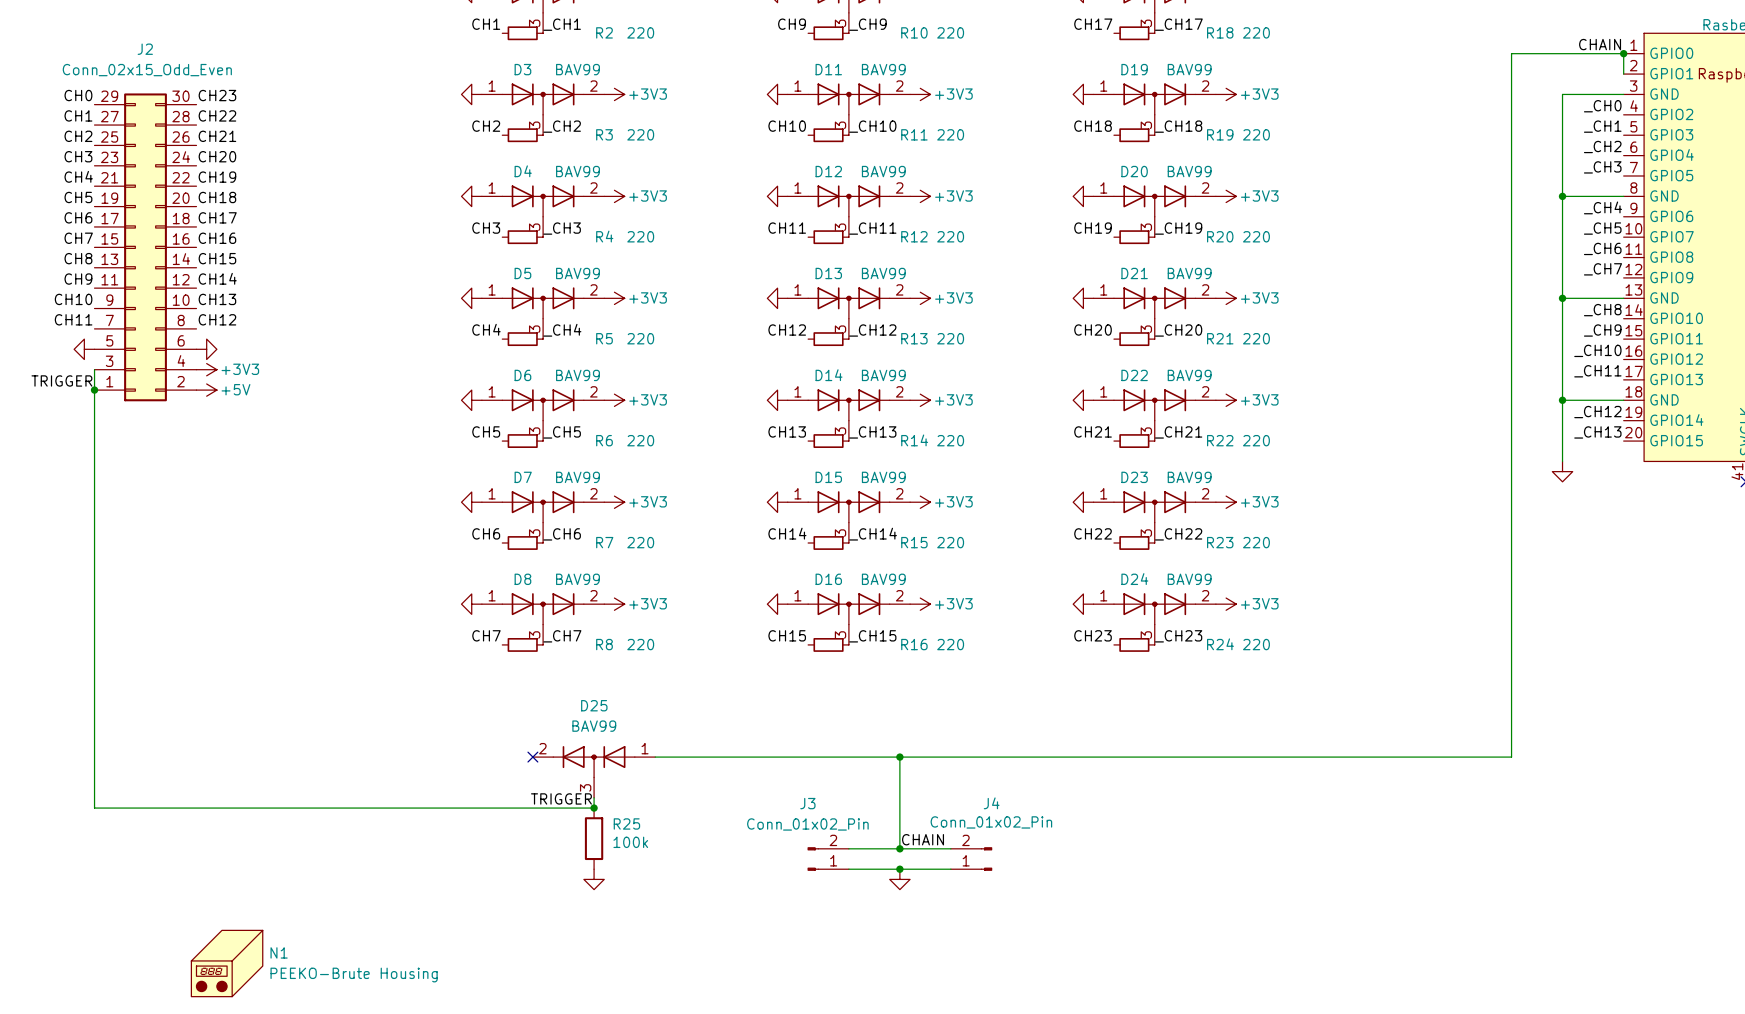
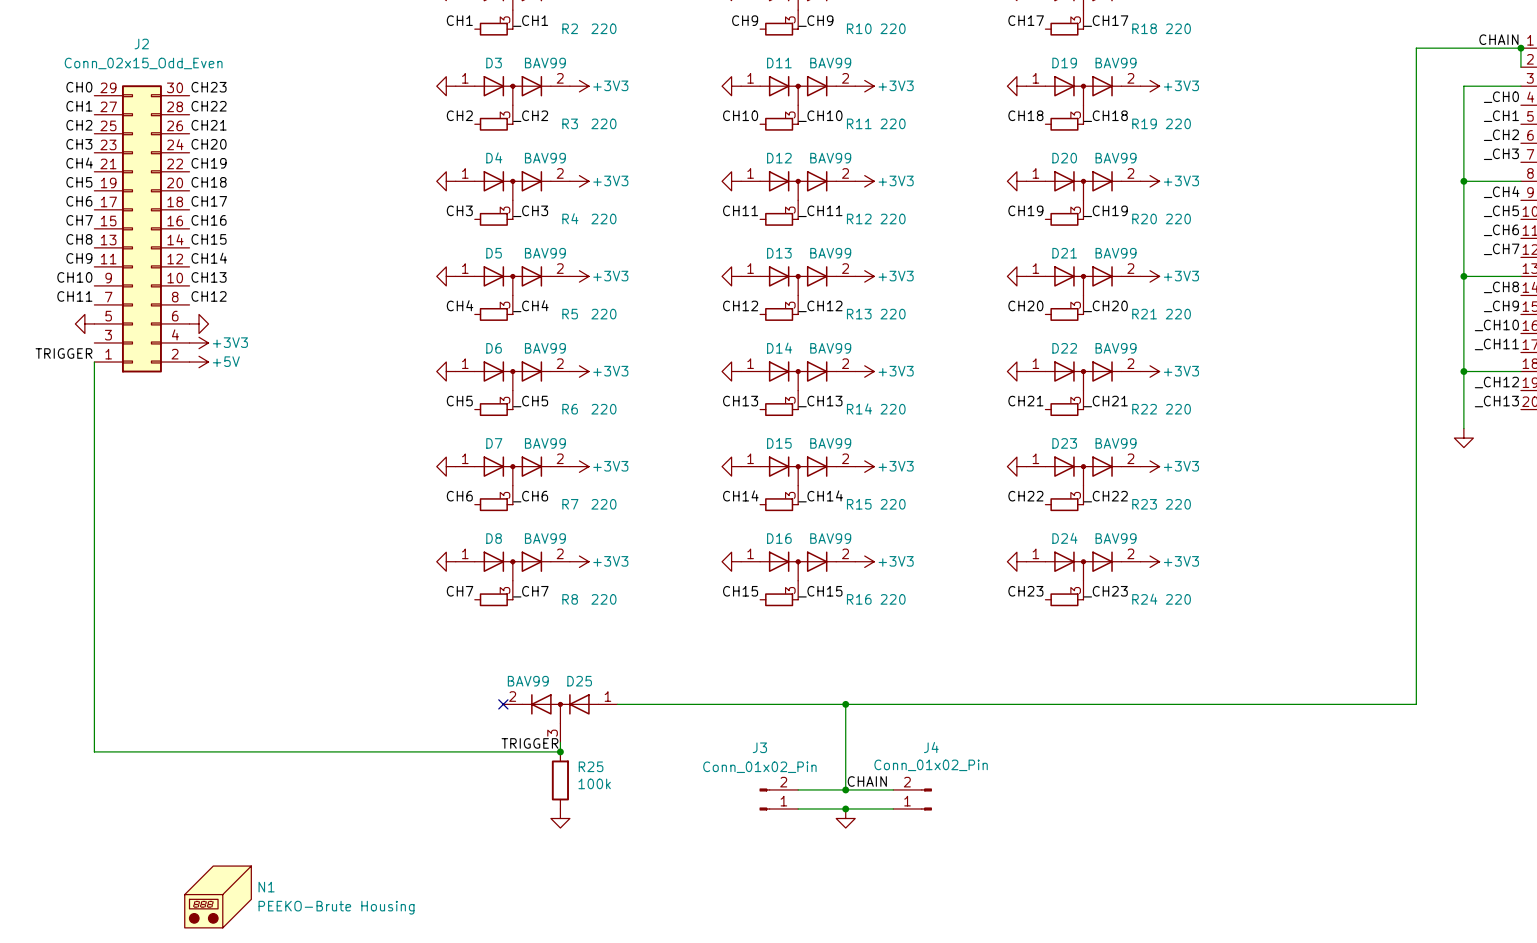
wire: (94, 369) (94, 390) -> none
junction: (94, 390) -> none
D25 name position: D25 (594, 705) -> D25 (579, 681)
D25 value position: BAV99 (594, 726) -> BAV99 (528, 681)

